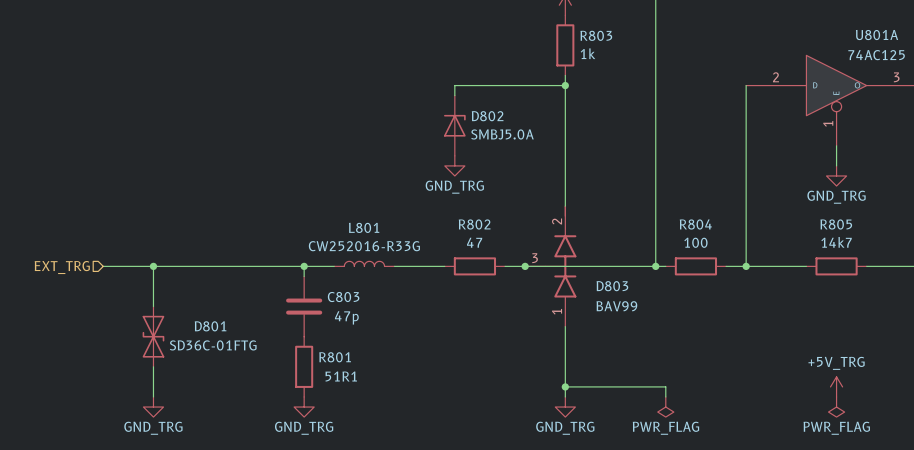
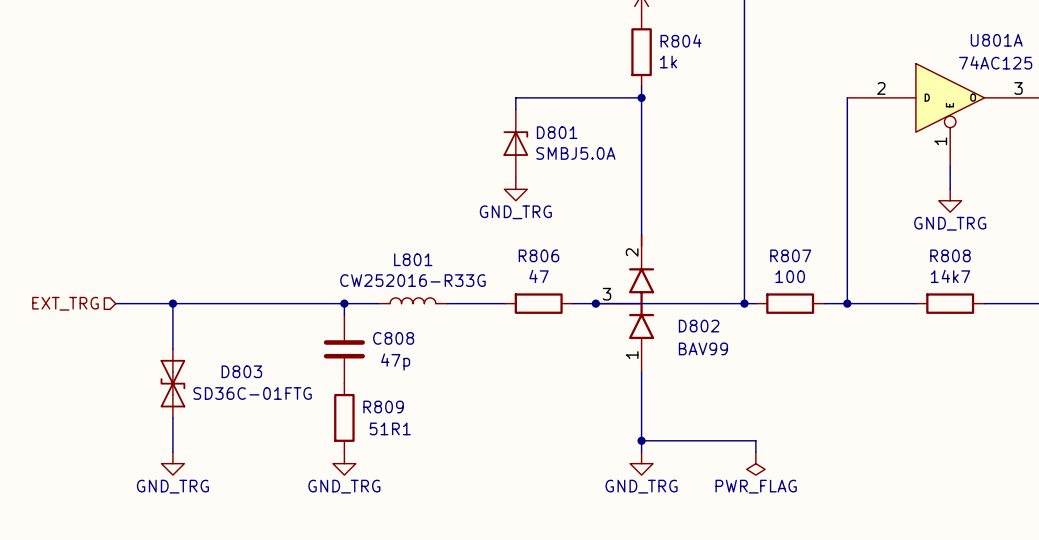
R803 name: R803 (596, 35) -> R804 (681, 40)
D802 name: D802 (487, 116) -> D801 (557, 132)
R802 name: R802 (474, 224) -> R806 (538, 255)
R804 name: R804 (695, 224) -> R807 (790, 255)
R805 name: R805 (836, 224) -> R808 (950, 255)
D803 name: D803 (612, 286) -> D802 (699, 326)
C803 name: C803 (343, 297) -> C808 (393, 338)
D801 name: D801 (210, 326) -> D803 (241, 371)
R801 name: R801 (335, 357) -> R809 (383, 406)
power symbol: +5V_TRG (836, 386) -> none
power symbol: PWR_FLAG (836, 407) -> none

